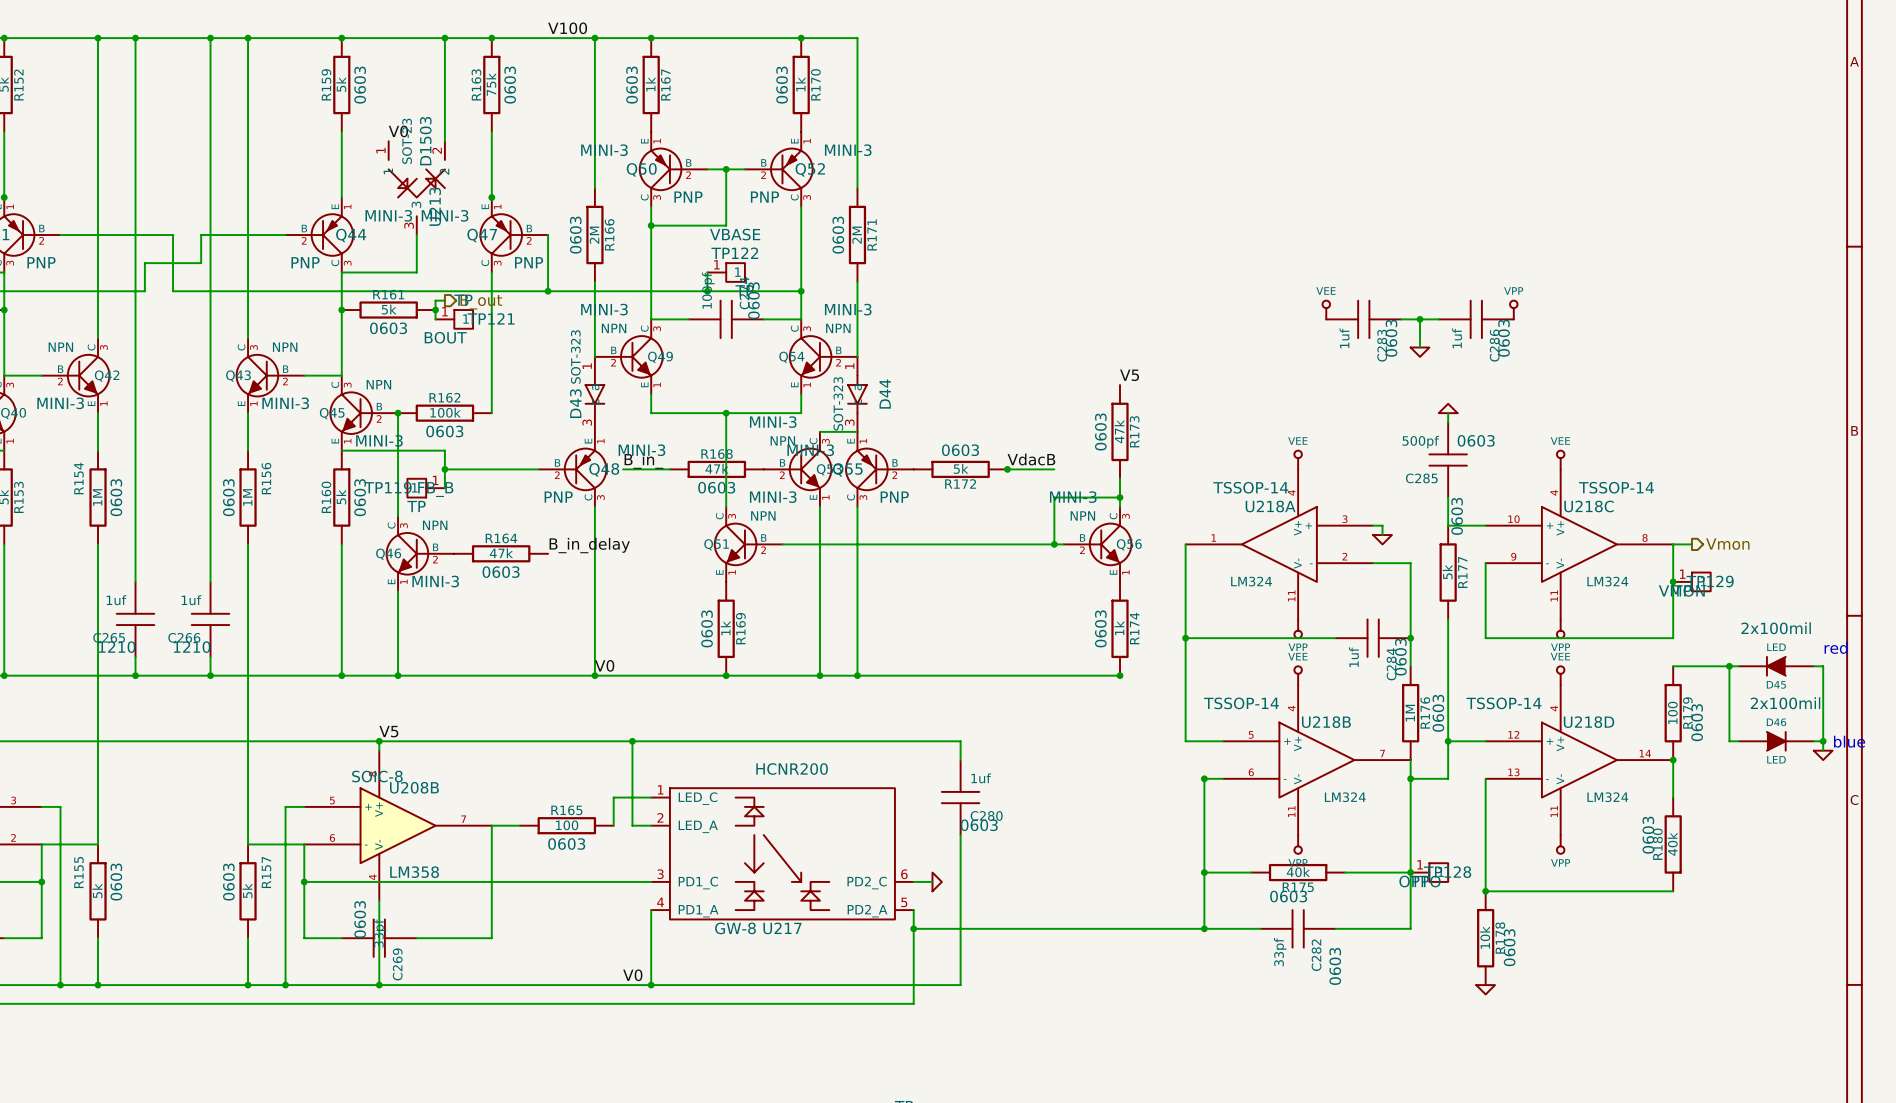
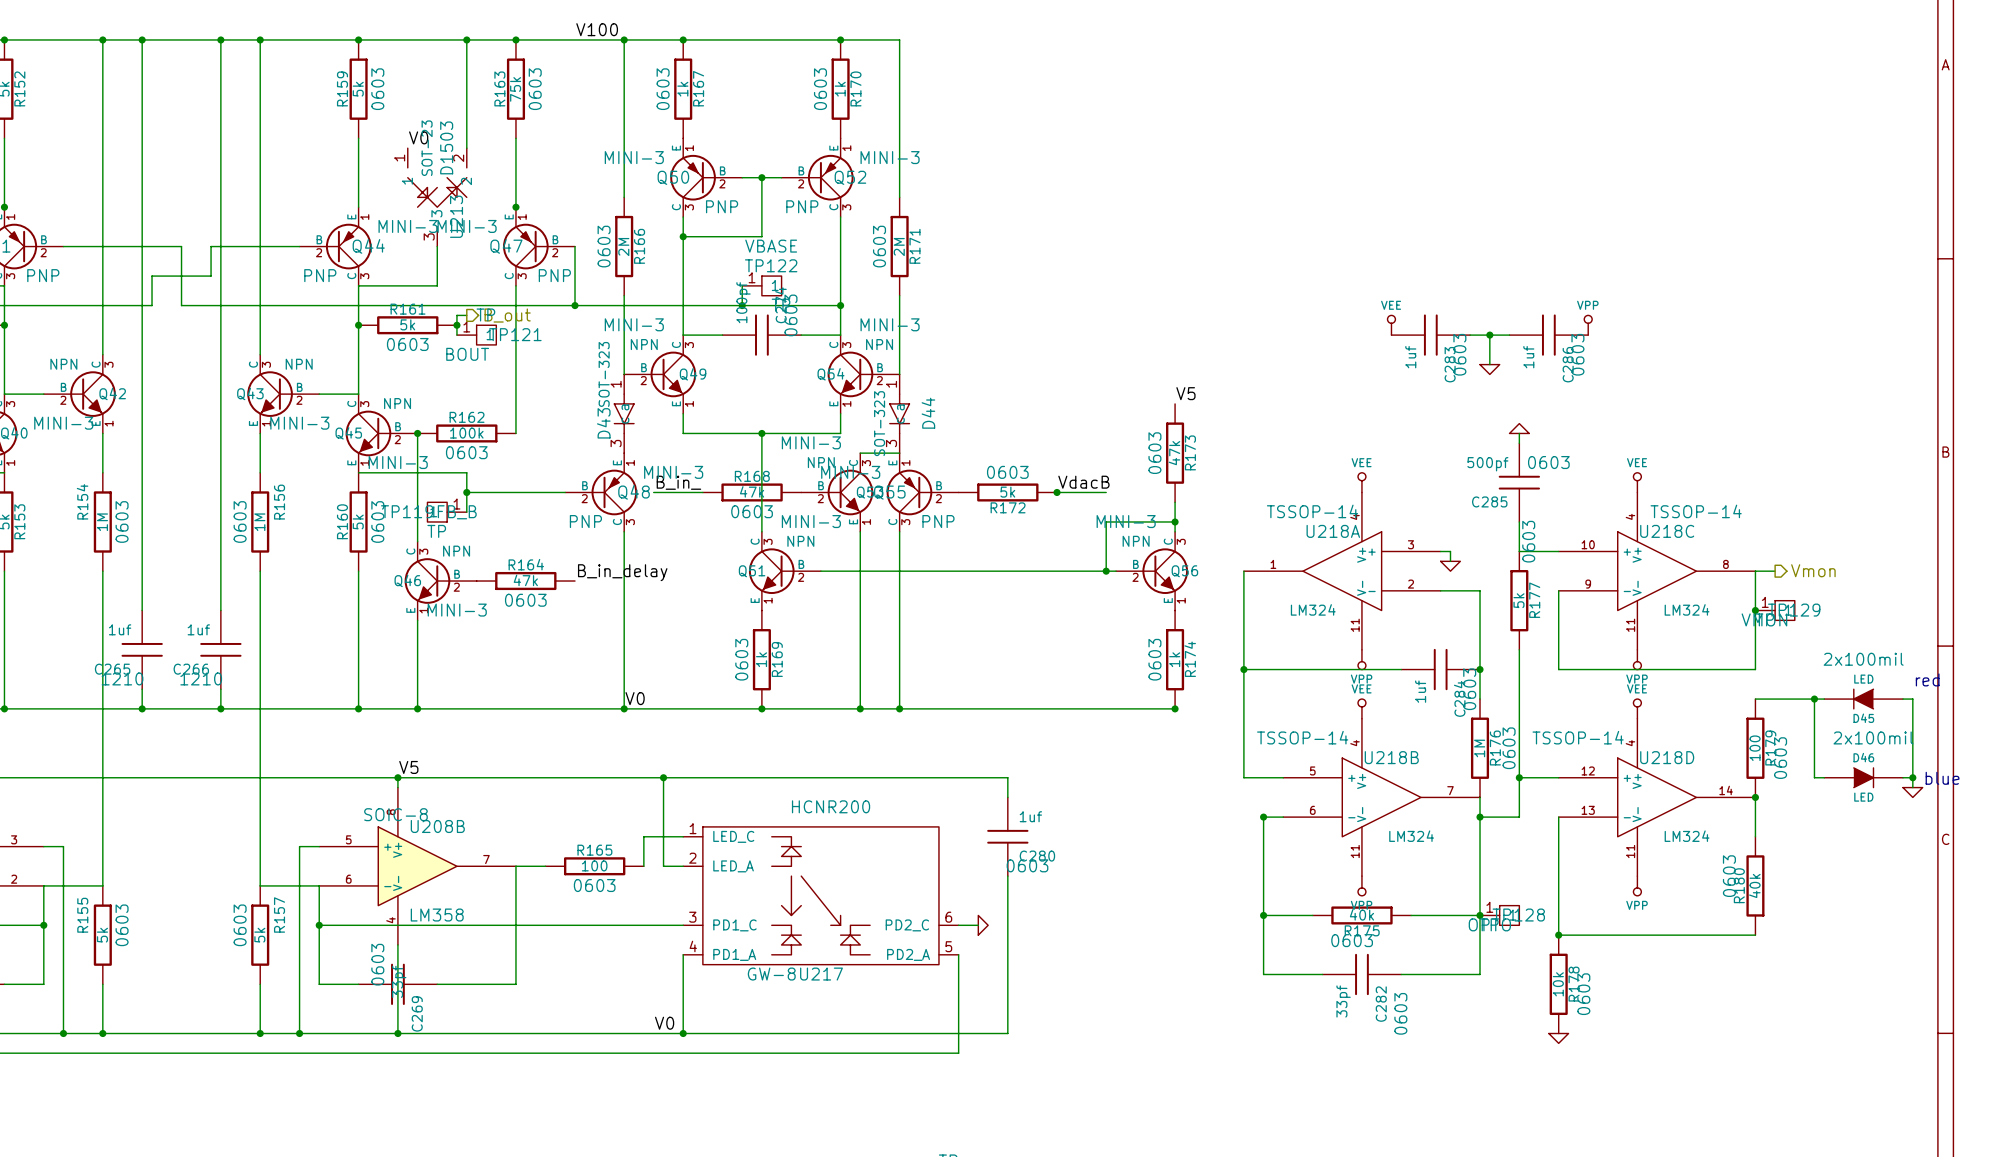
wire: (913, 928) (1204, 928) -> none
junction: (913, 928) -> none
junction: (1204, 928) -> none

